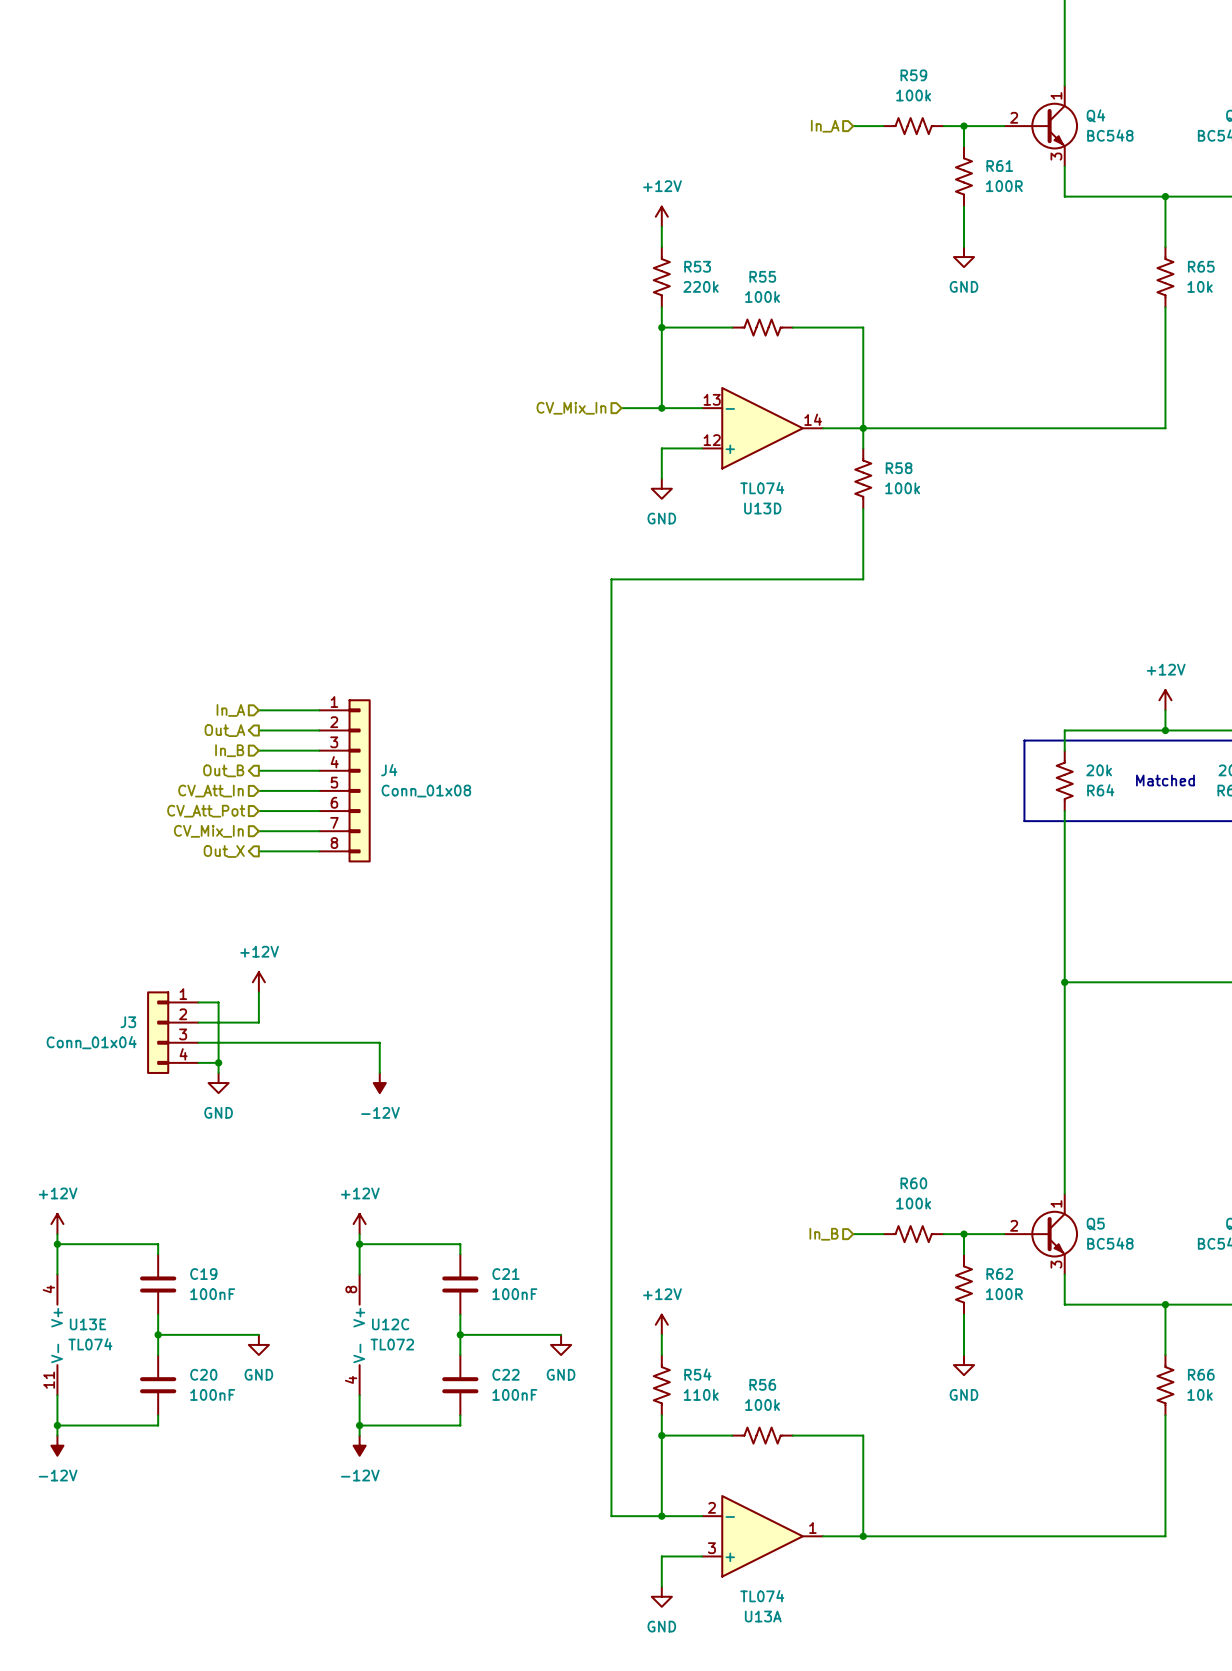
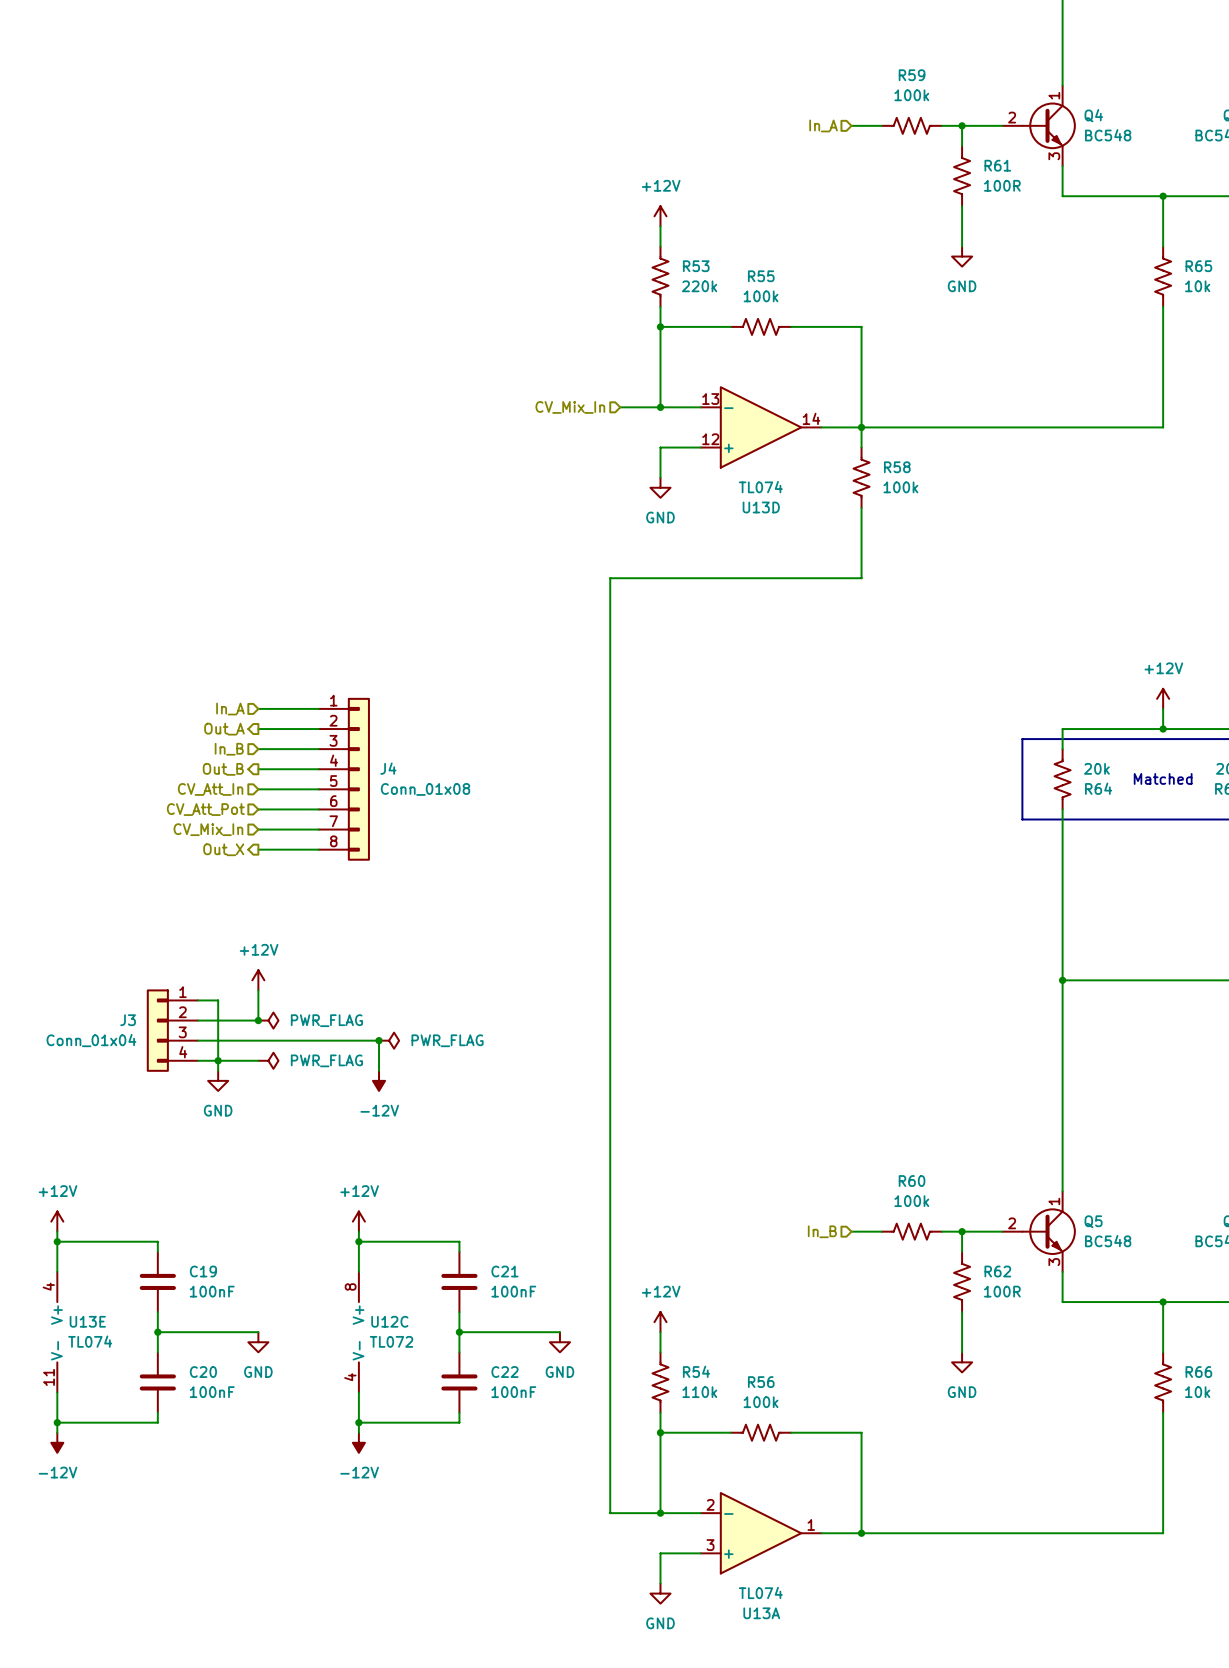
junction: none -> (258, 1020)
power symbol: none -> PWR_FLAG (268, 1020)
junction: none -> (379, 1040)
power symbol: none -> PWR_FLAG (389, 1040)
wire: none -> (218, 1060) (258, 1060)
power symbol: none -> PWR_FLAG (268, 1060)

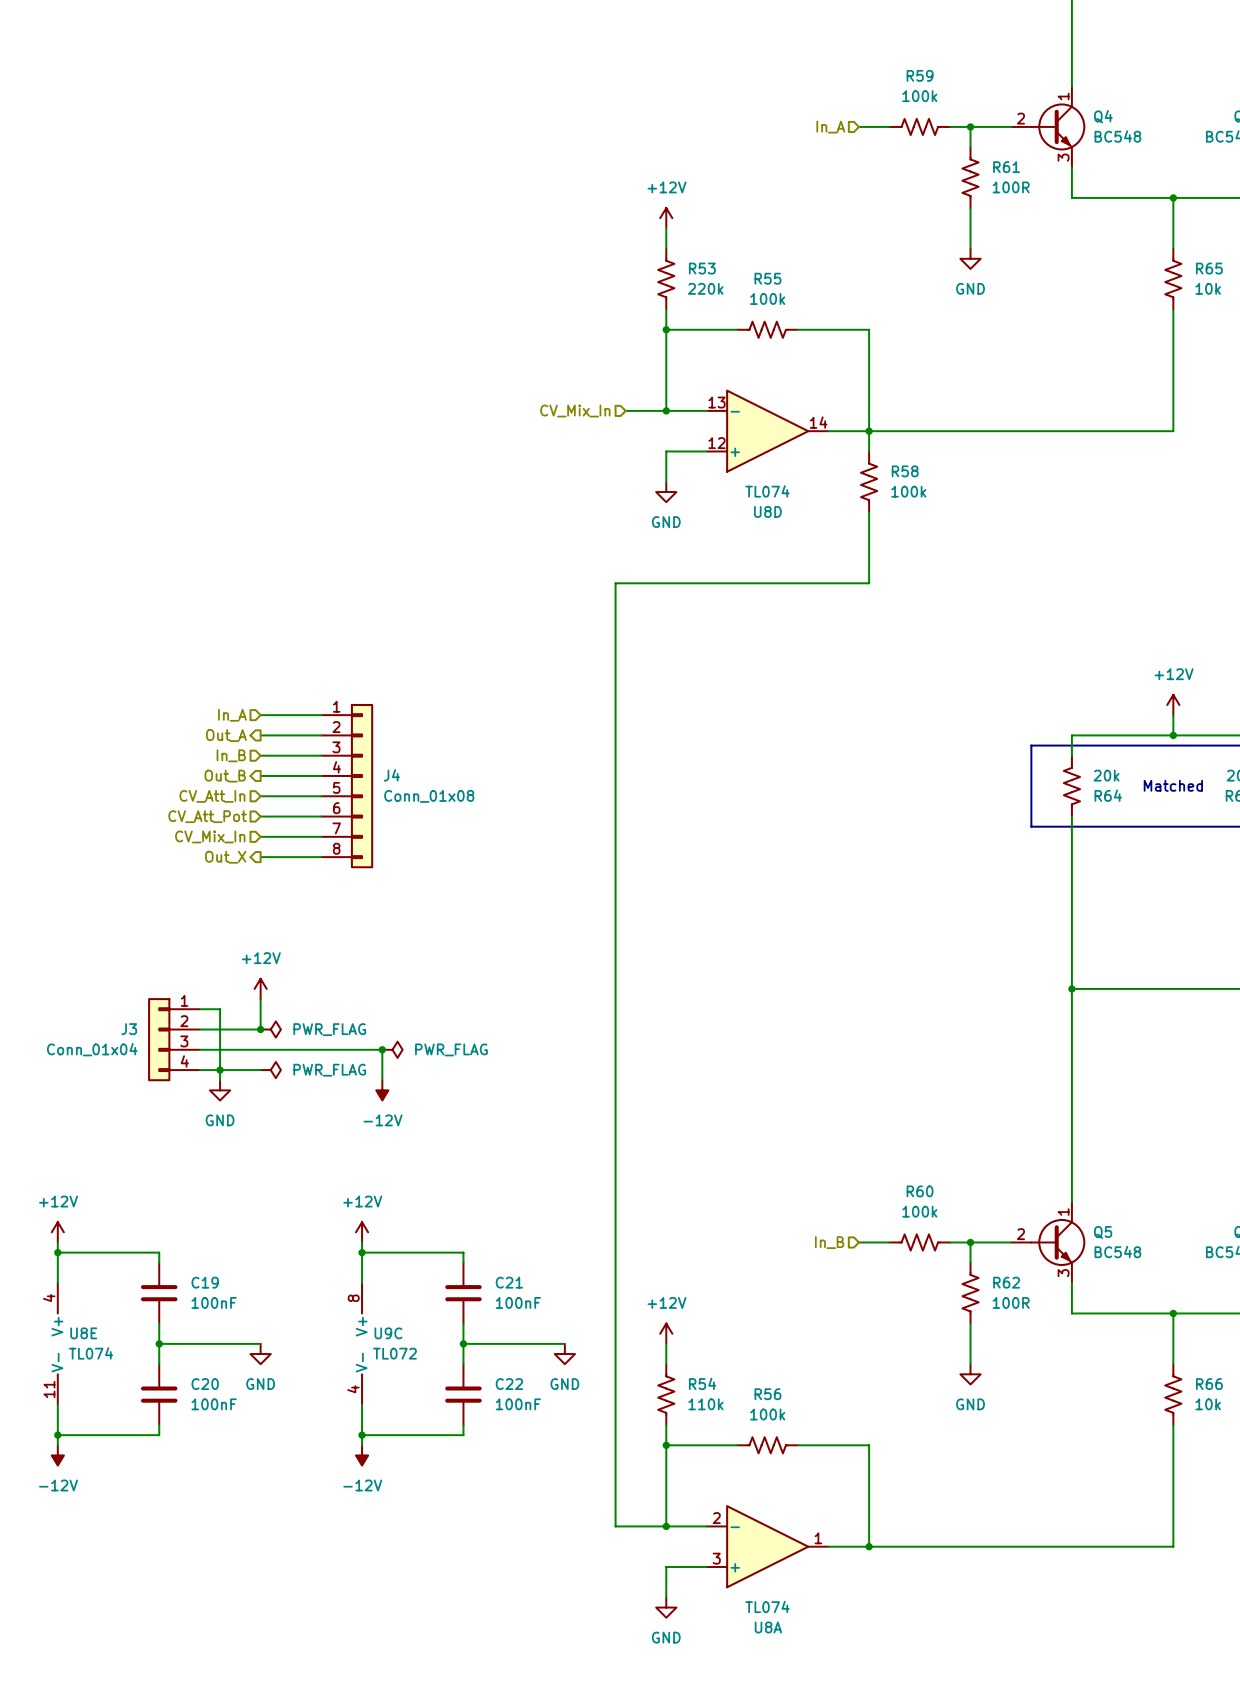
U13D name: U13D (761, 507) -> U8D (767, 511)
U13E name: U13E (87, 1321) -> U8E (83, 1333)
U12C name: U12C (389, 1321) -> U9C (388, 1333)
U13A name: U13A (761, 1613) -> U8A (768, 1627)

